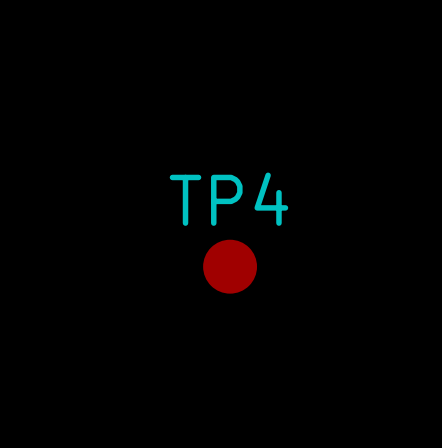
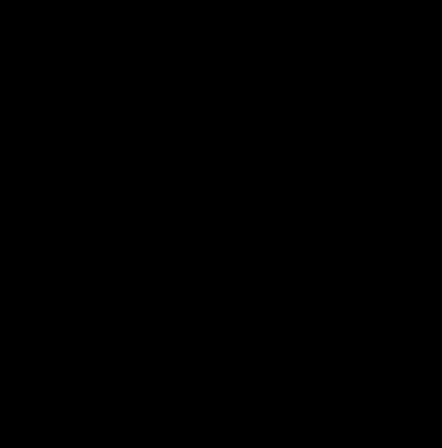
TP4: (230, 266) -> none

